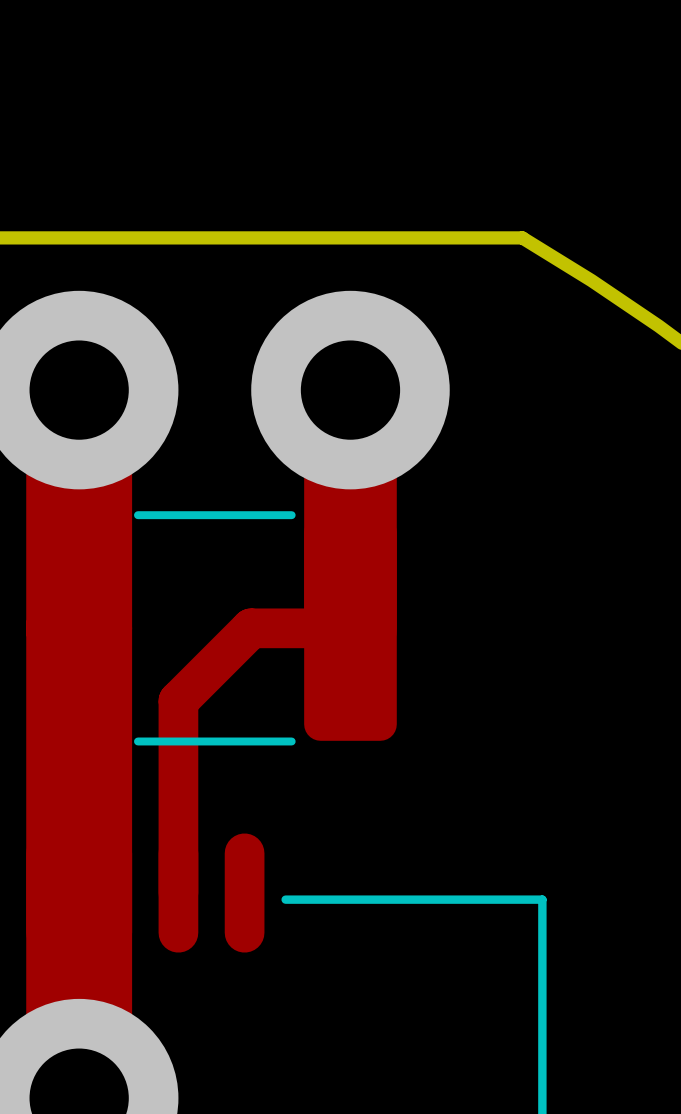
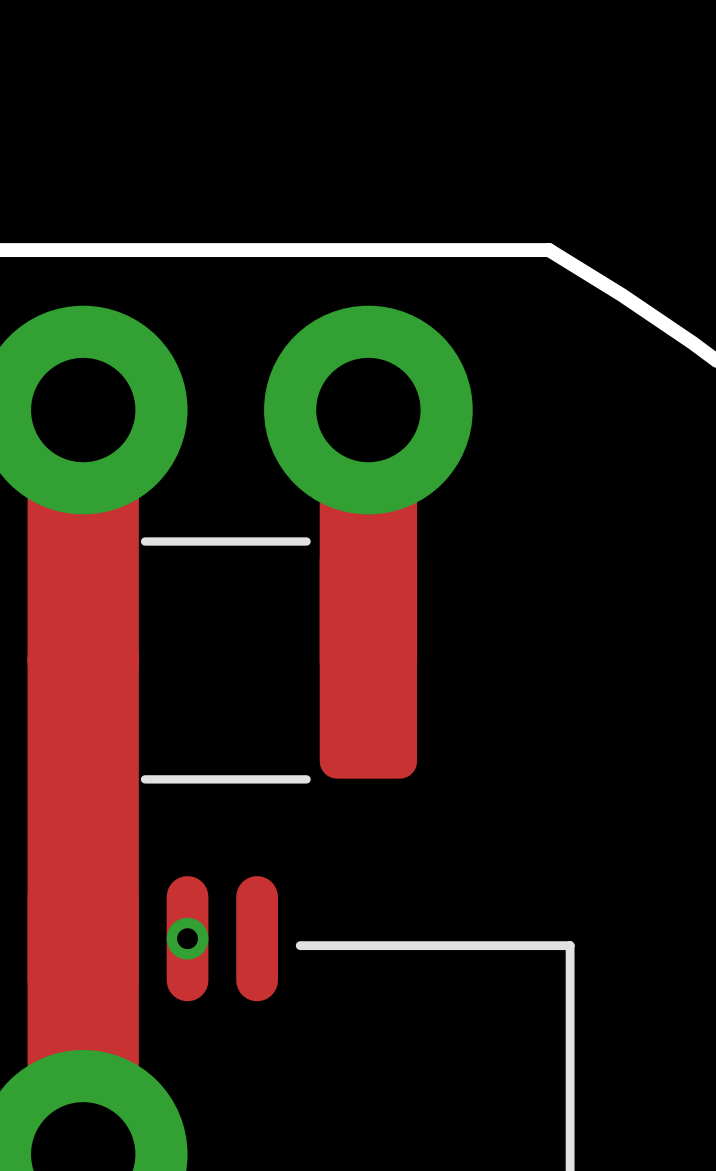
top track: (350, 628) (251, 628) (178, 701) (178, 893) -> none
via: none -> (187, 938)

